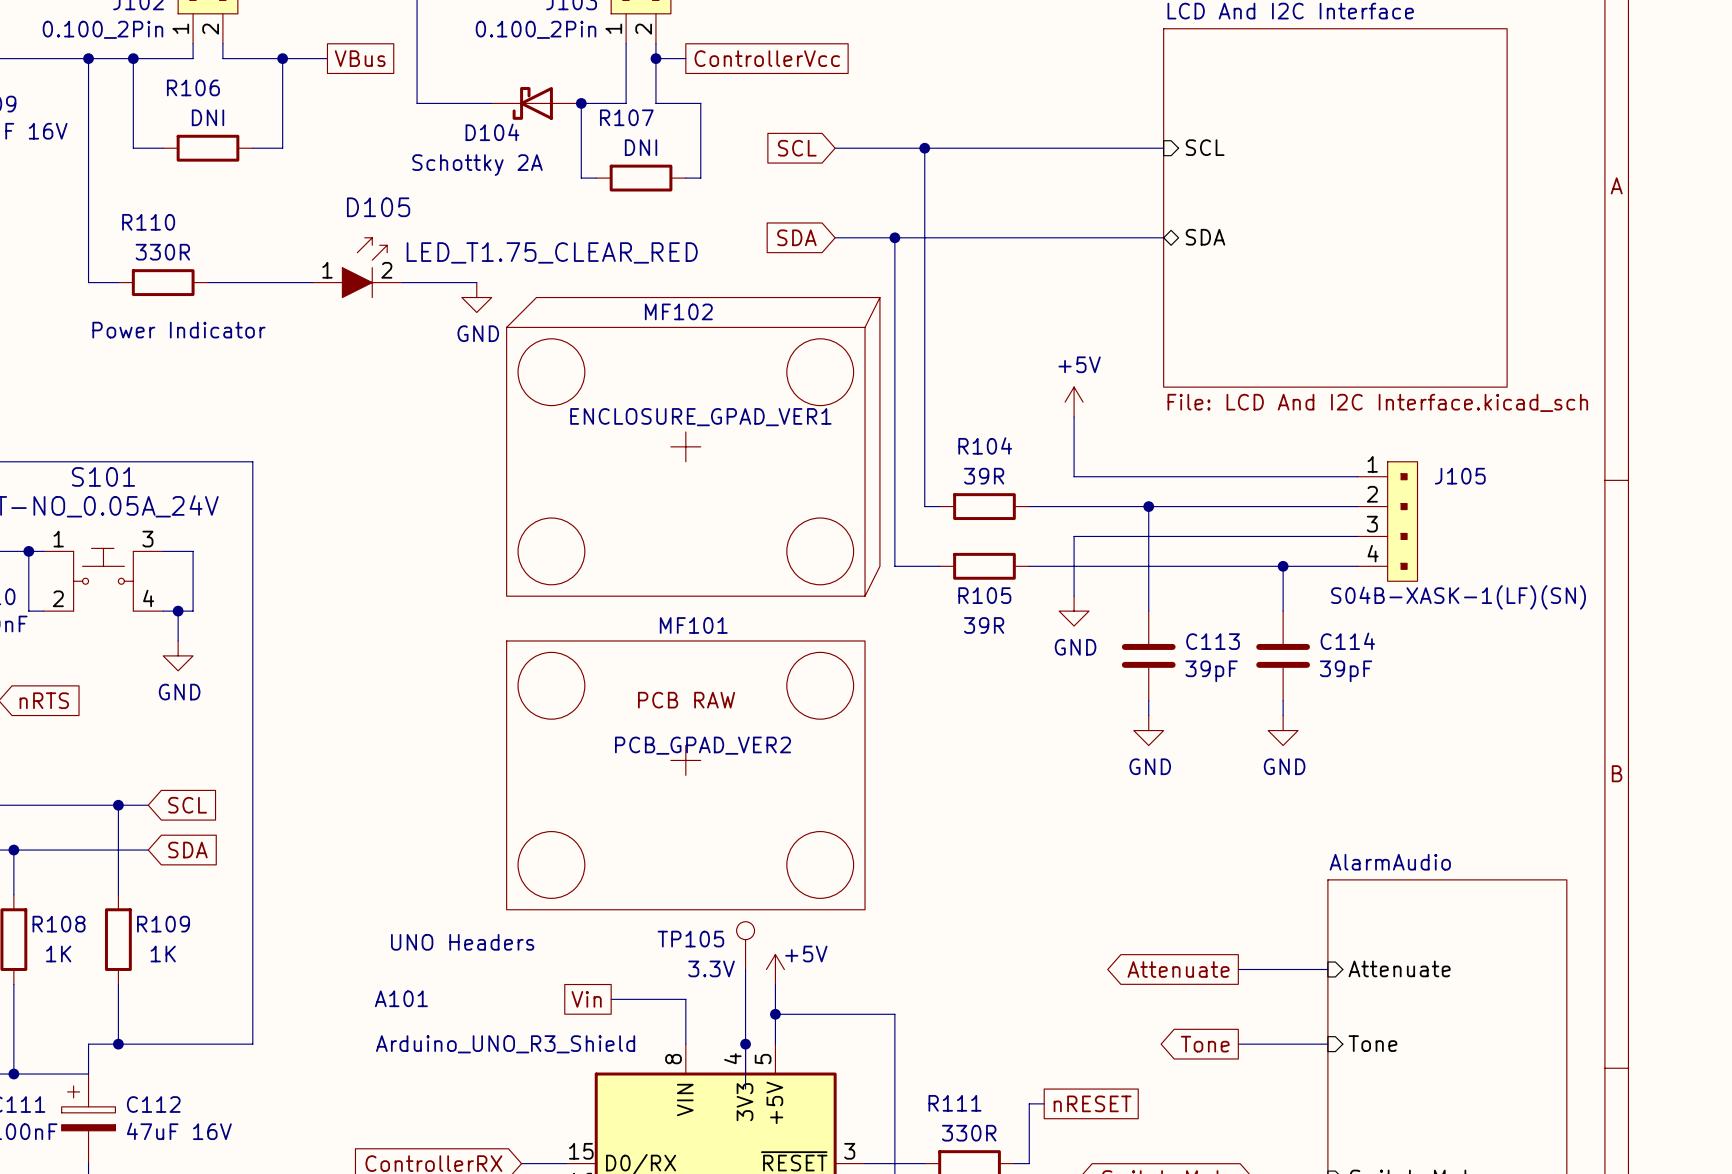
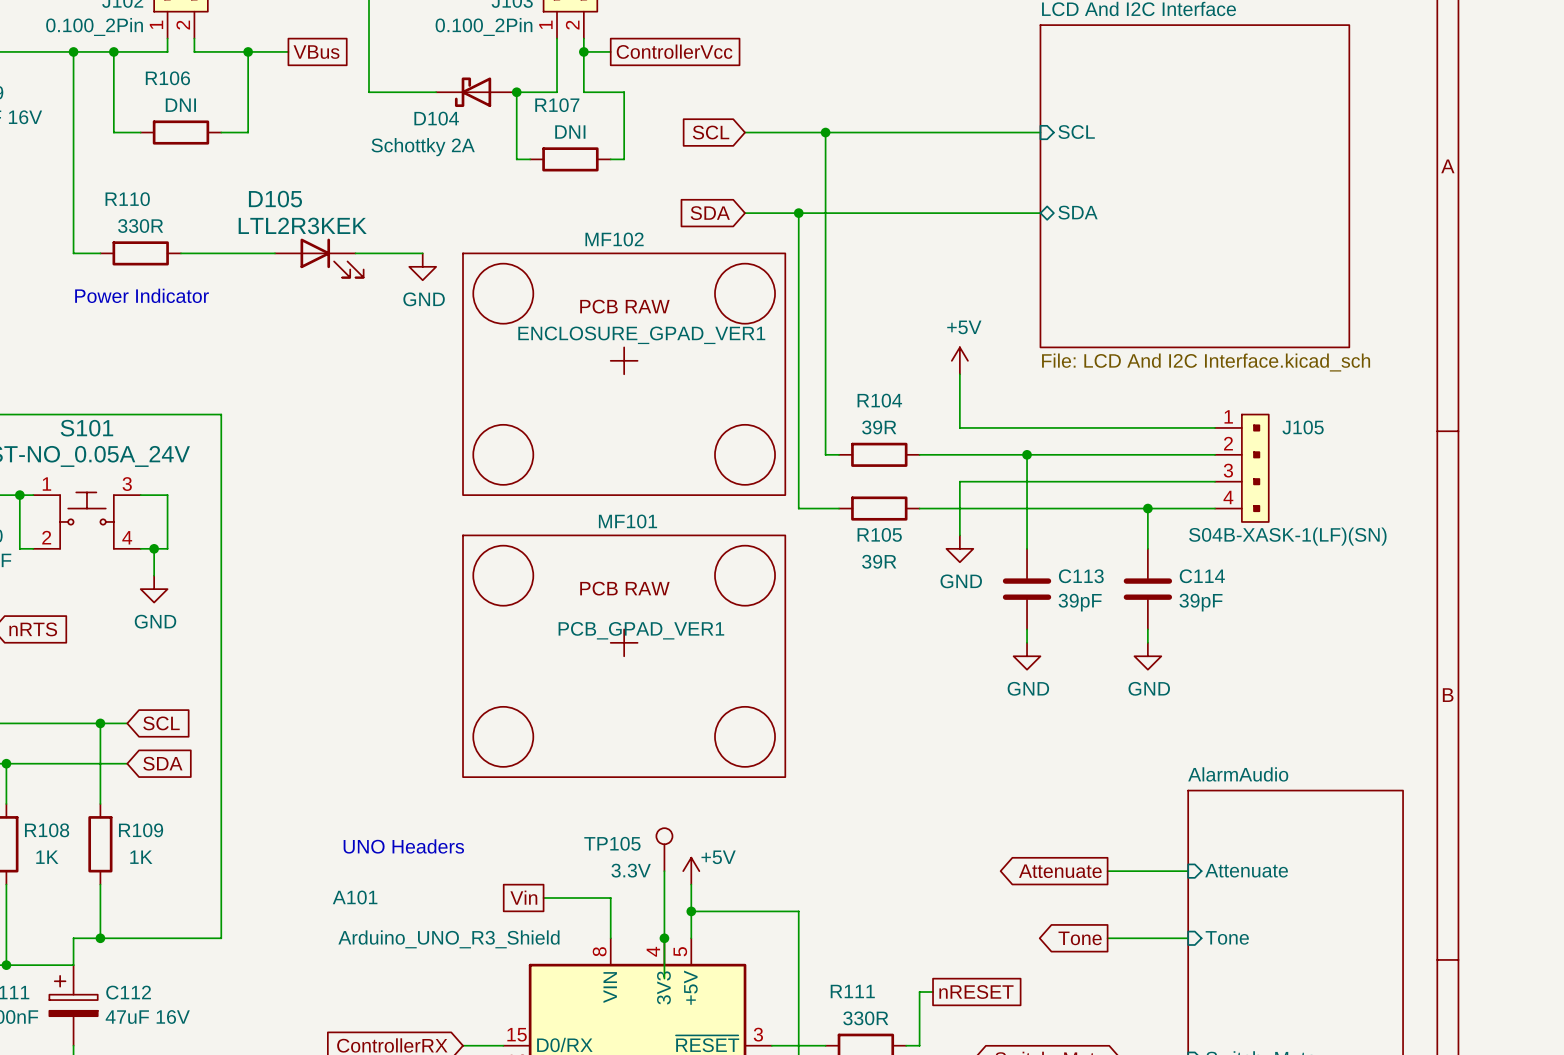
D105 name position: D105 (378, 207) -> D105 (275, 199)
D105 symbol: [312, 237, 403, 298] -> [274, 238, 364, 278]
D105 value: LED_T1.75_CLEAR_RED (552, 252) -> LTL2R3KEK (302, 225)
MF102 symbol: [506, 297, 880, 597] -> [463, 253, 786, 496]
MF101 value: PCB_GPAD_VER2 (703, 745) -> PCB_GPAD_VER1 (641, 630)
MF101 position: (685, 775) -> (624, 656)

